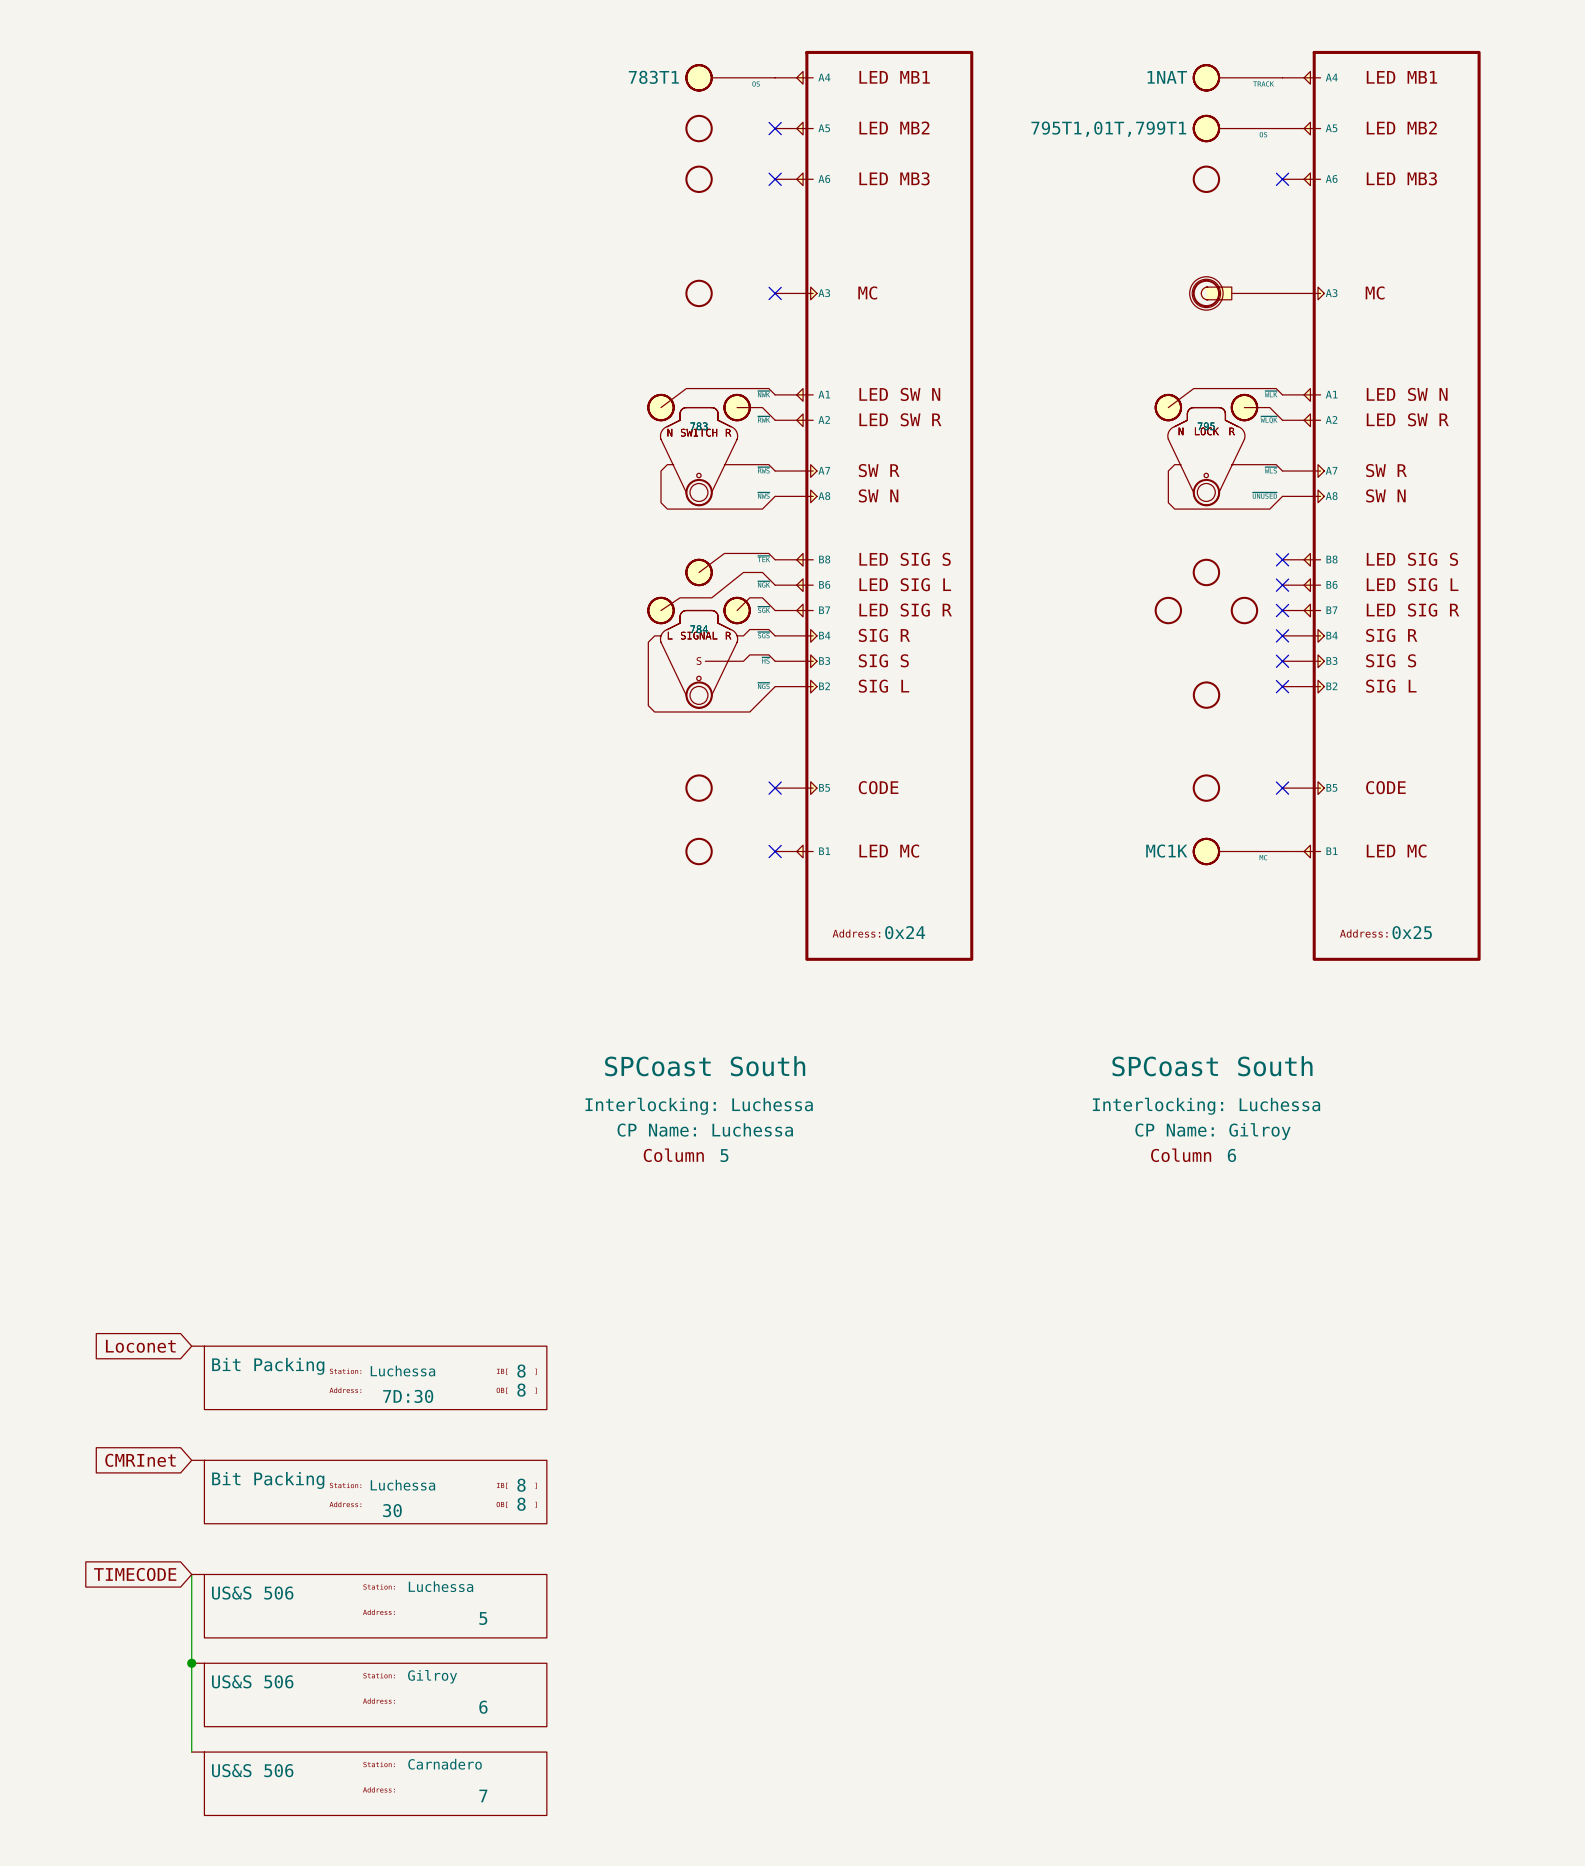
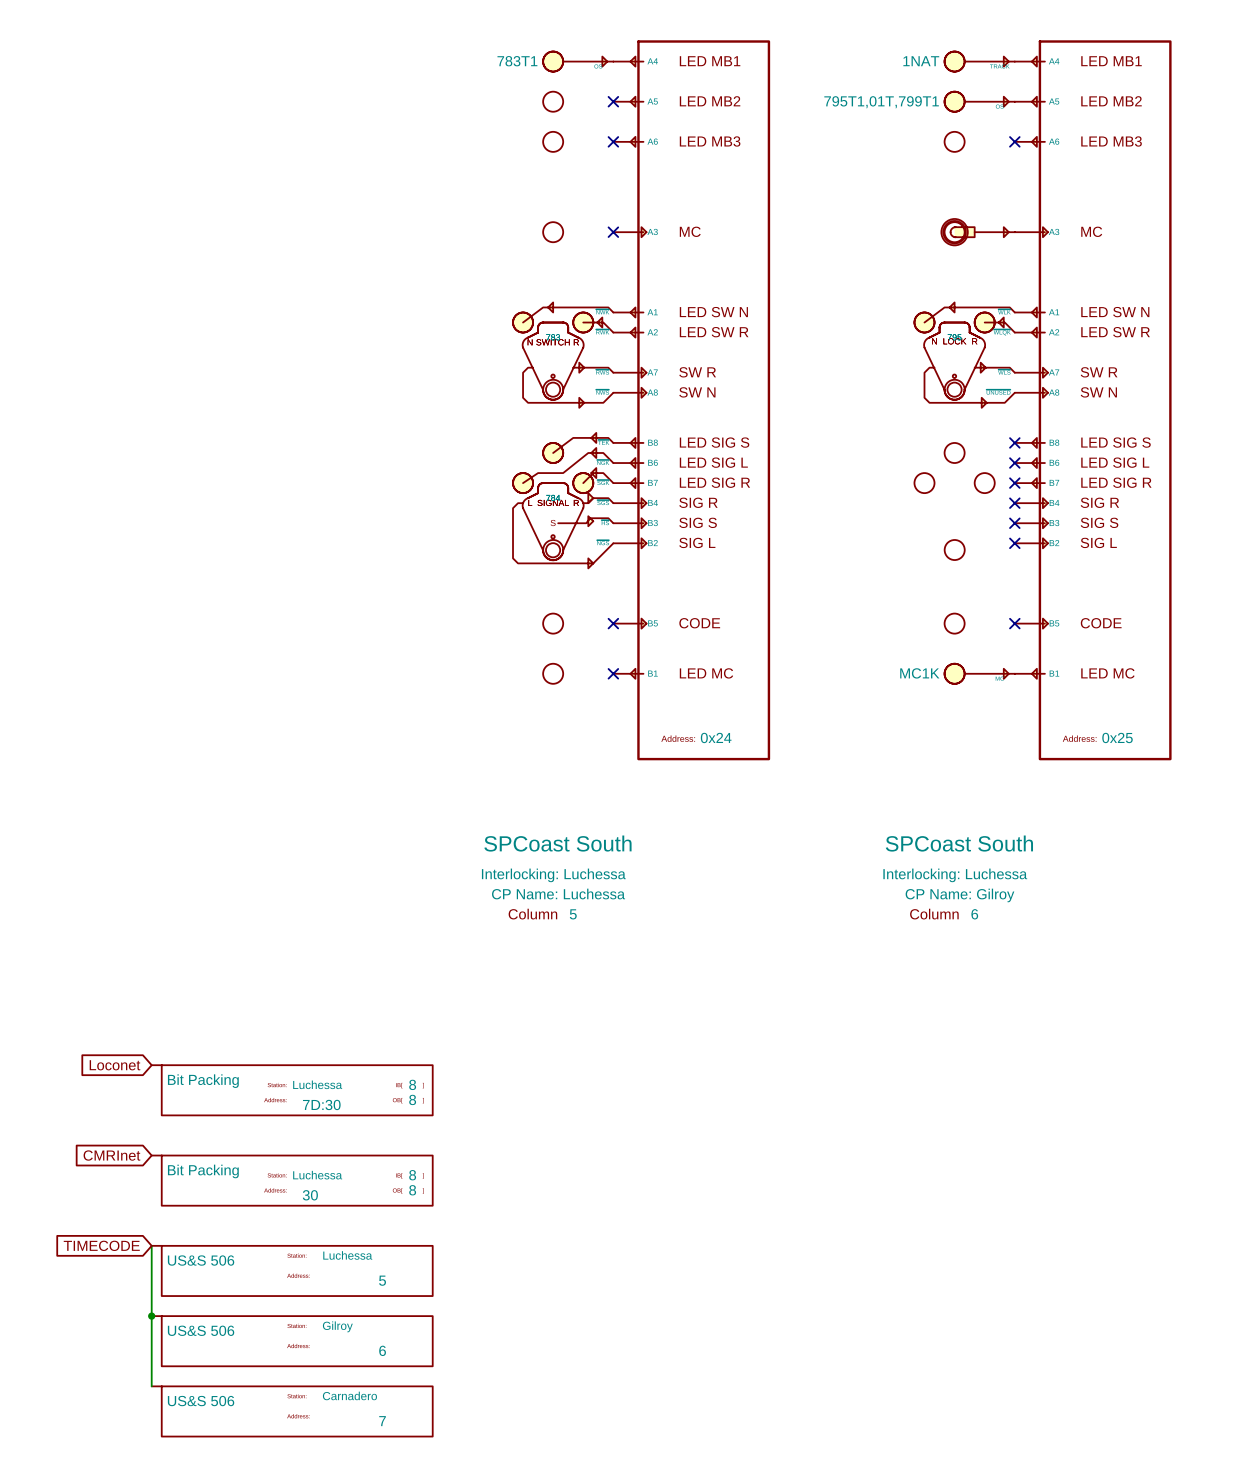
part symbol: [685, 64, 776, 92] -> [542, 50, 614, 73]
part symbol: [1192, 64, 1283, 92] -> [943, 50, 1015, 73]
part symbol: [1192, 114, 1283, 143] -> [943, 90, 1015, 113]
part symbol: [1189, 276, 1283, 311] -> [941, 218, 1015, 246]
part symbol: [647, 388, 776, 427] -> [512, 302, 614, 338]
part symbol: [1154, 388, 1283, 427] -> [913, 302, 1015, 338]
part symbol: [660, 407, 776, 510] -> [522, 322, 614, 408]
part symbol: [1167, 407, 1283, 510] -> [924, 322, 1015, 408]
part symbol: [647, 553, 776, 630] -> [512, 432, 614, 499]
part symbol: [648, 610, 776, 712] -> [513, 483, 614, 569]
part symbol: [1192, 837, 1283, 866] -> [943, 662, 1015, 685]

